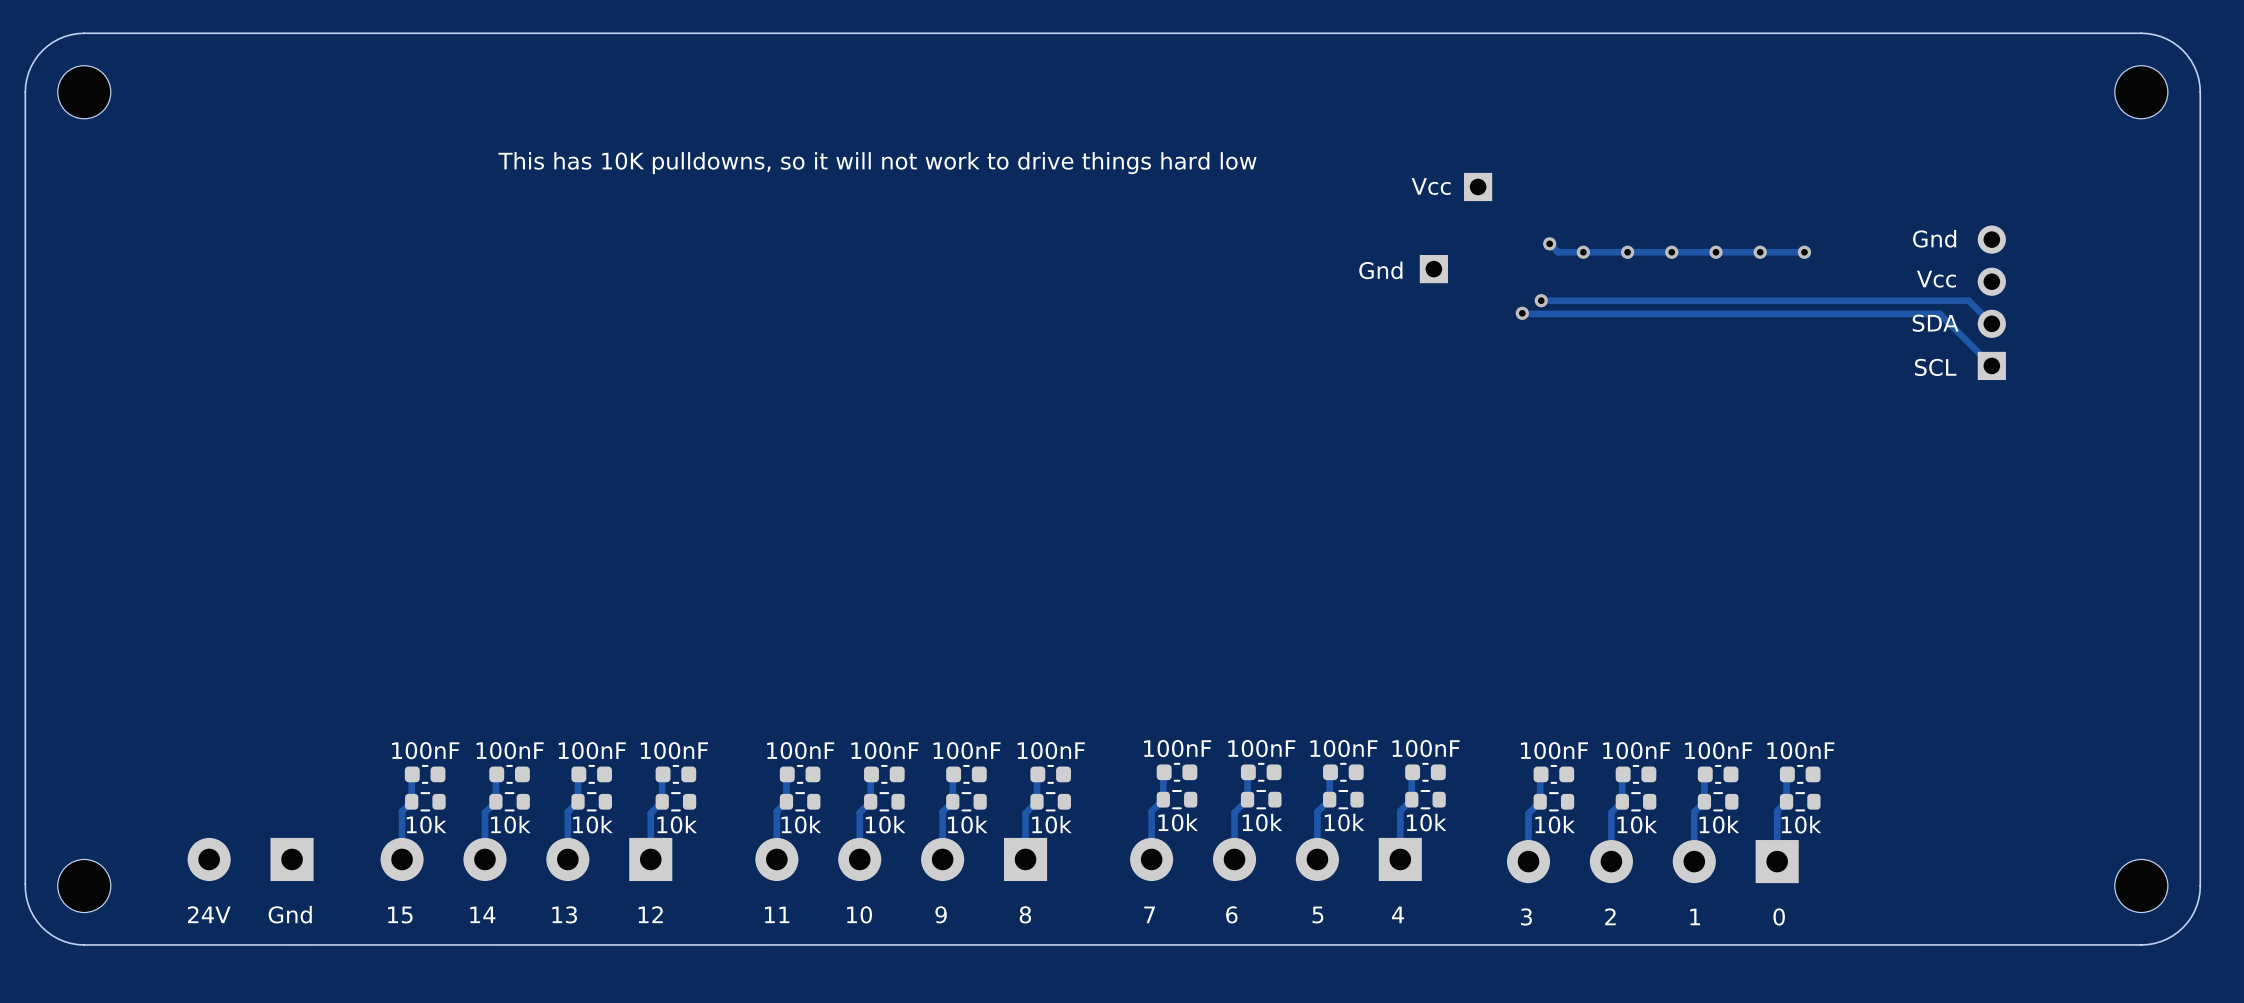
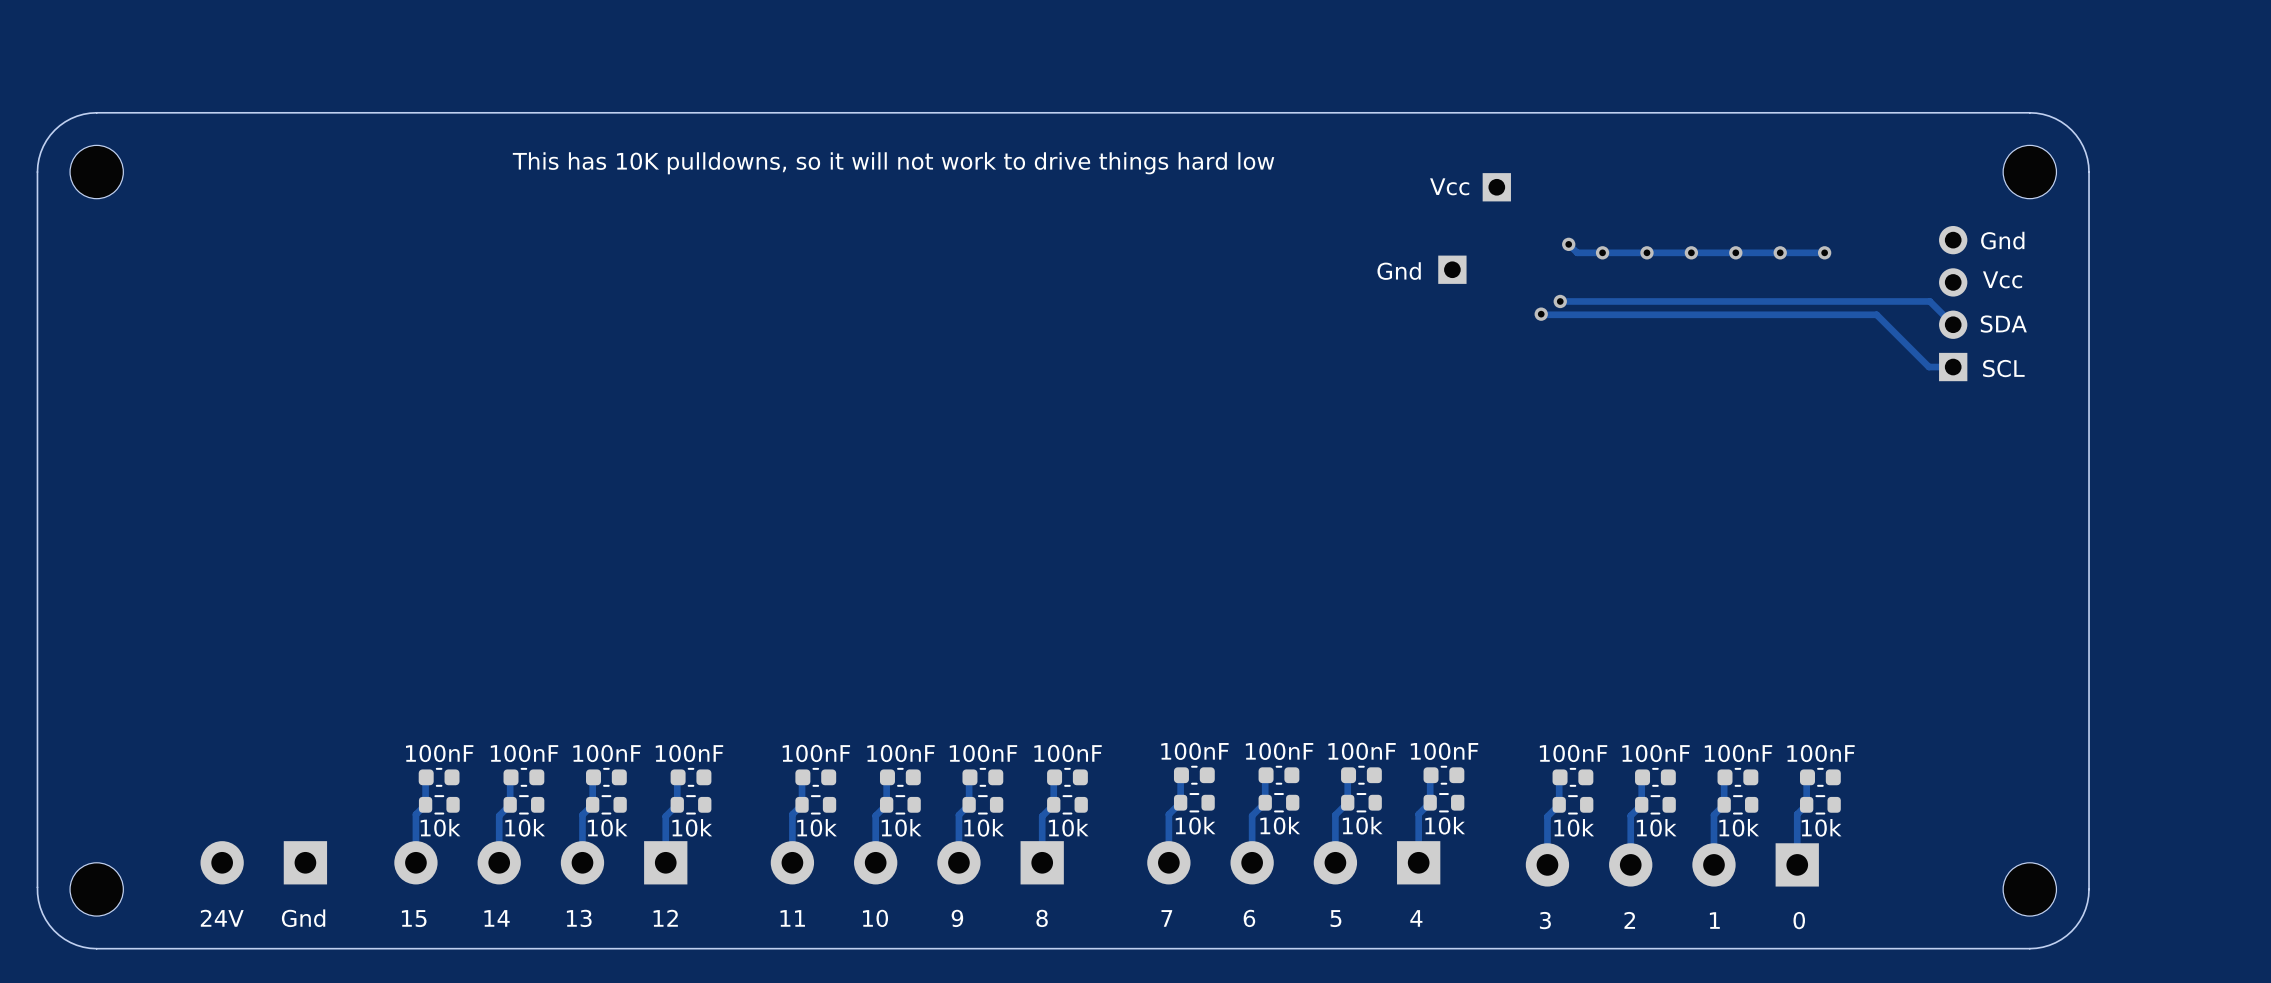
part position: (84, 92) -> (96, 172)
part position: (2141, 92) -> (2029, 172)
board edge: (25, 171) (25, 92) (28, 72) (34, 60) (47, 46) (64, 36) (77, 33) (2141, 33) (2160, 36) (2172, 42) (2187, 55) (2196, 72) (2200, 92) (2199, 892) (2194, 911) (2183, 927) (2172, 935) (2154, 943) (2008, 944) -> (37, 172) (43, 146) (54, 130) (77, 116) (96, 112) (2029, 112) (2049, 116) (2066, 125) (2079, 140) (2087, 158) (2089, 172) (2089, 889) (2083, 915) (2071, 931) (2055, 942) (2029, 948)
text position: Gnd (1934, 238) -> Gnd (2002, 240)
text position: Vcc (1936, 279) -> Vcc (2002, 279)
track: (1909, 300) (1968, 300) (1991, 323) -> (1929, 301) (1953, 324)
part position: (1991, 302) -> (1953, 303)
track: (1856, 313) (1939, 313) (1991, 365) -> (1876, 314) (1928, 367) (1953, 367)
text position: SDA (1935, 323) -> SDA (2003, 324)
text position: SCL (1935, 367) -> SCL (2003, 368)
part position: (2141, 886) -> (2029, 889)

